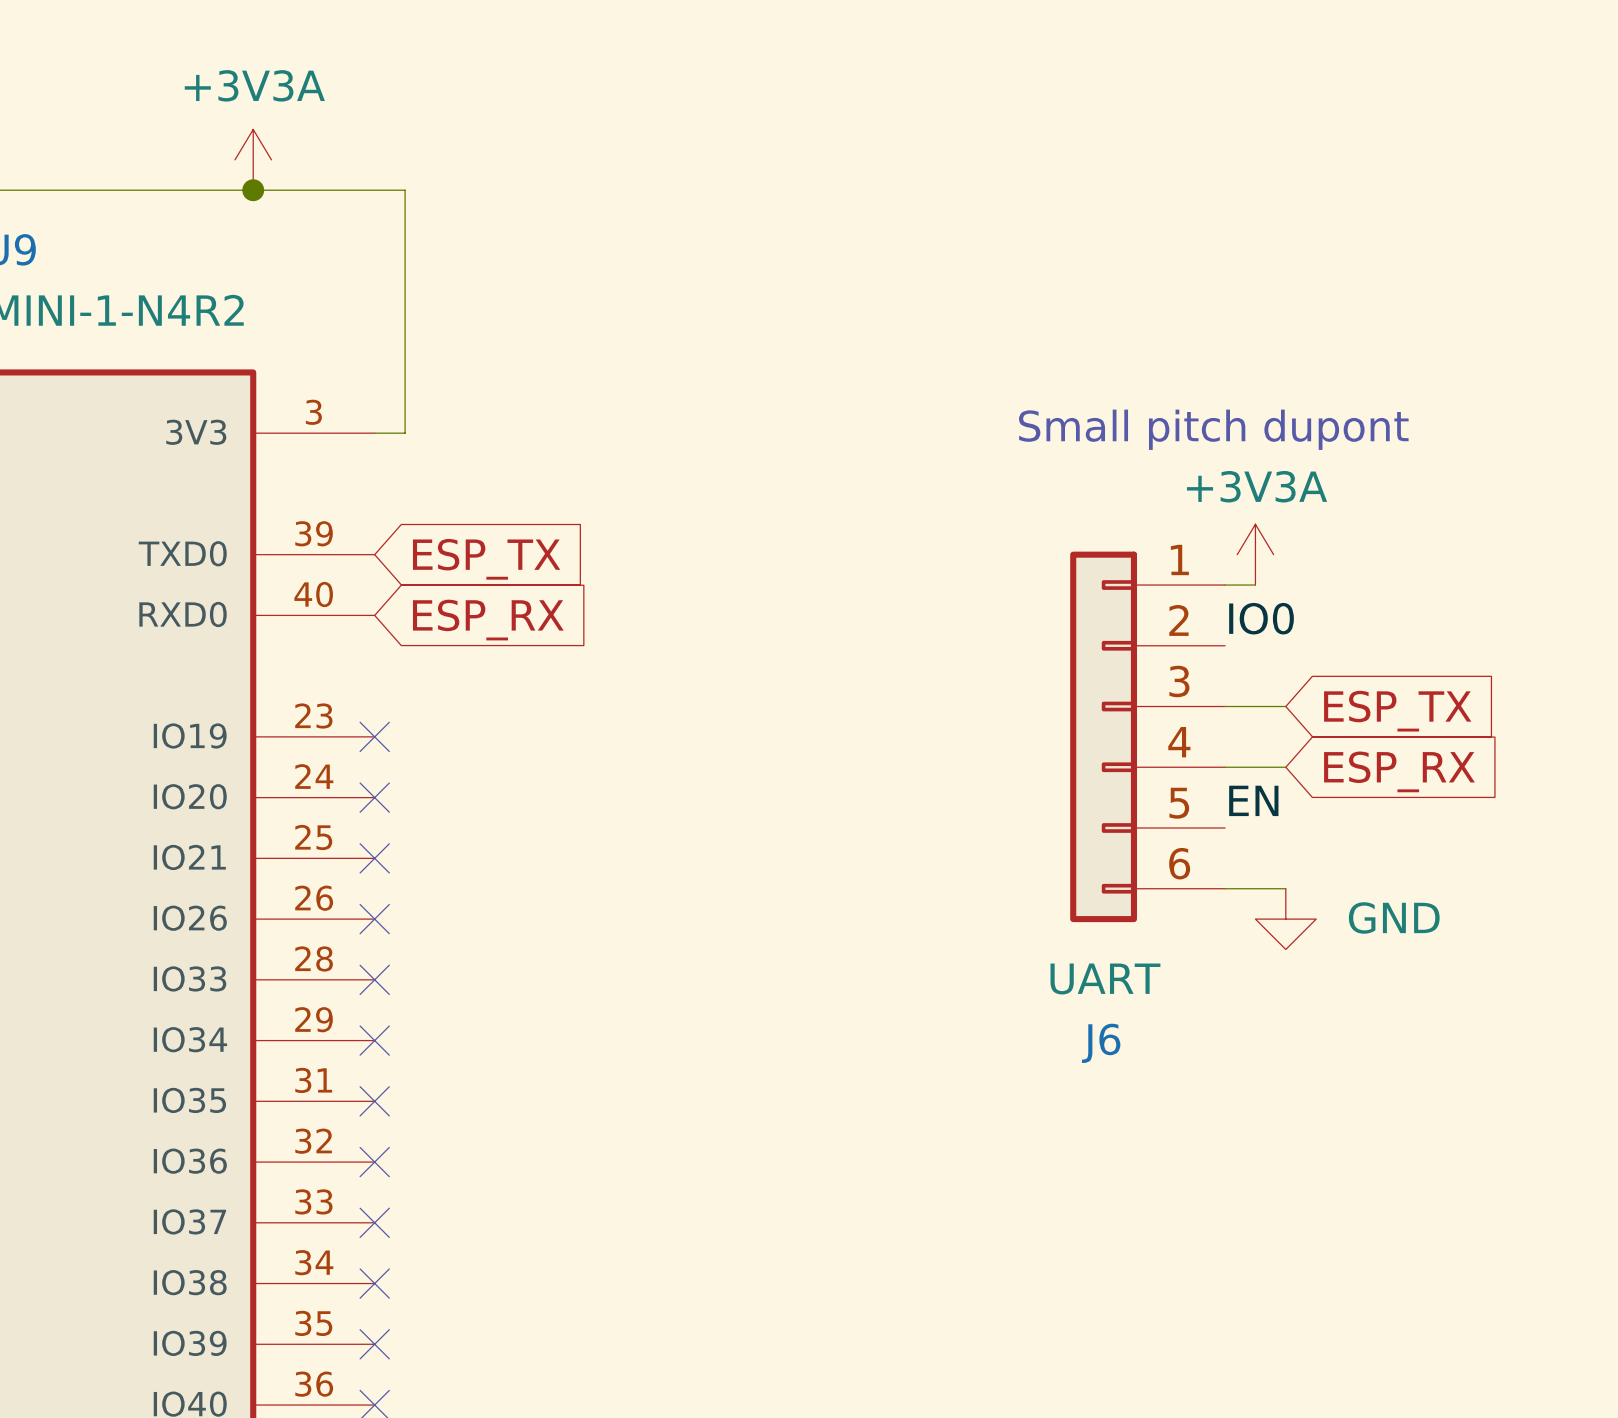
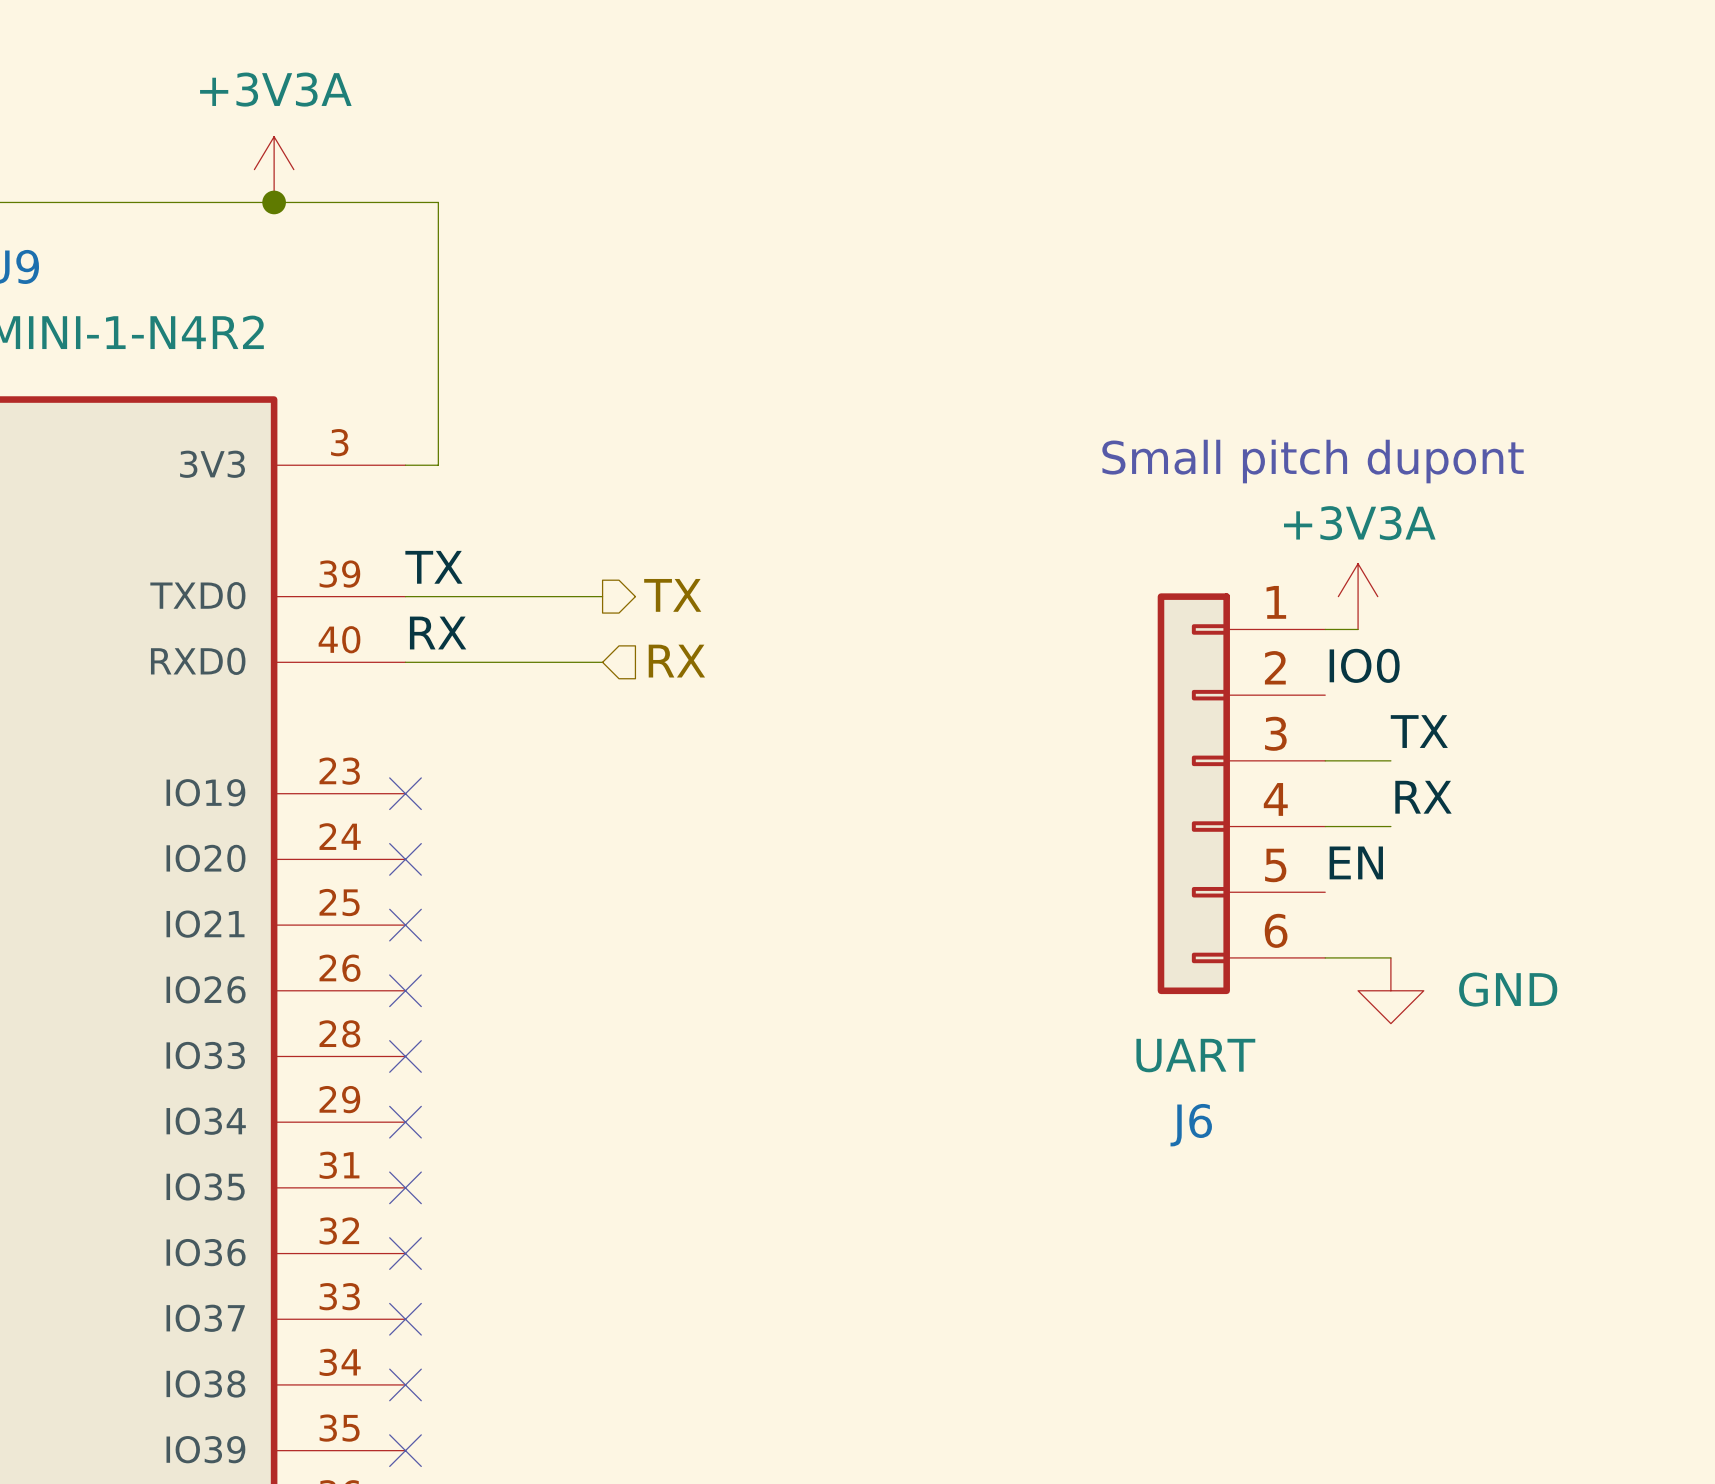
label: none -> TX (433, 567)
hierarchical label: none -> TX (672, 595)
wire: none -> (405, 596) (602, 596)
global label: ESP_TX (486, 559) -> none
label: none -> RX (438, 633)
hierarchical label: none -> RX (676, 661)
wire: none -> (405, 662) (602, 662)
global label: ESP_RX (488, 620) -> none
label: none -> TX (1419, 731)
global label: ESP_TX (1397, 711) -> none
label: none -> RX (1423, 797)
global label: ESP_RX (1399, 771) -> none

